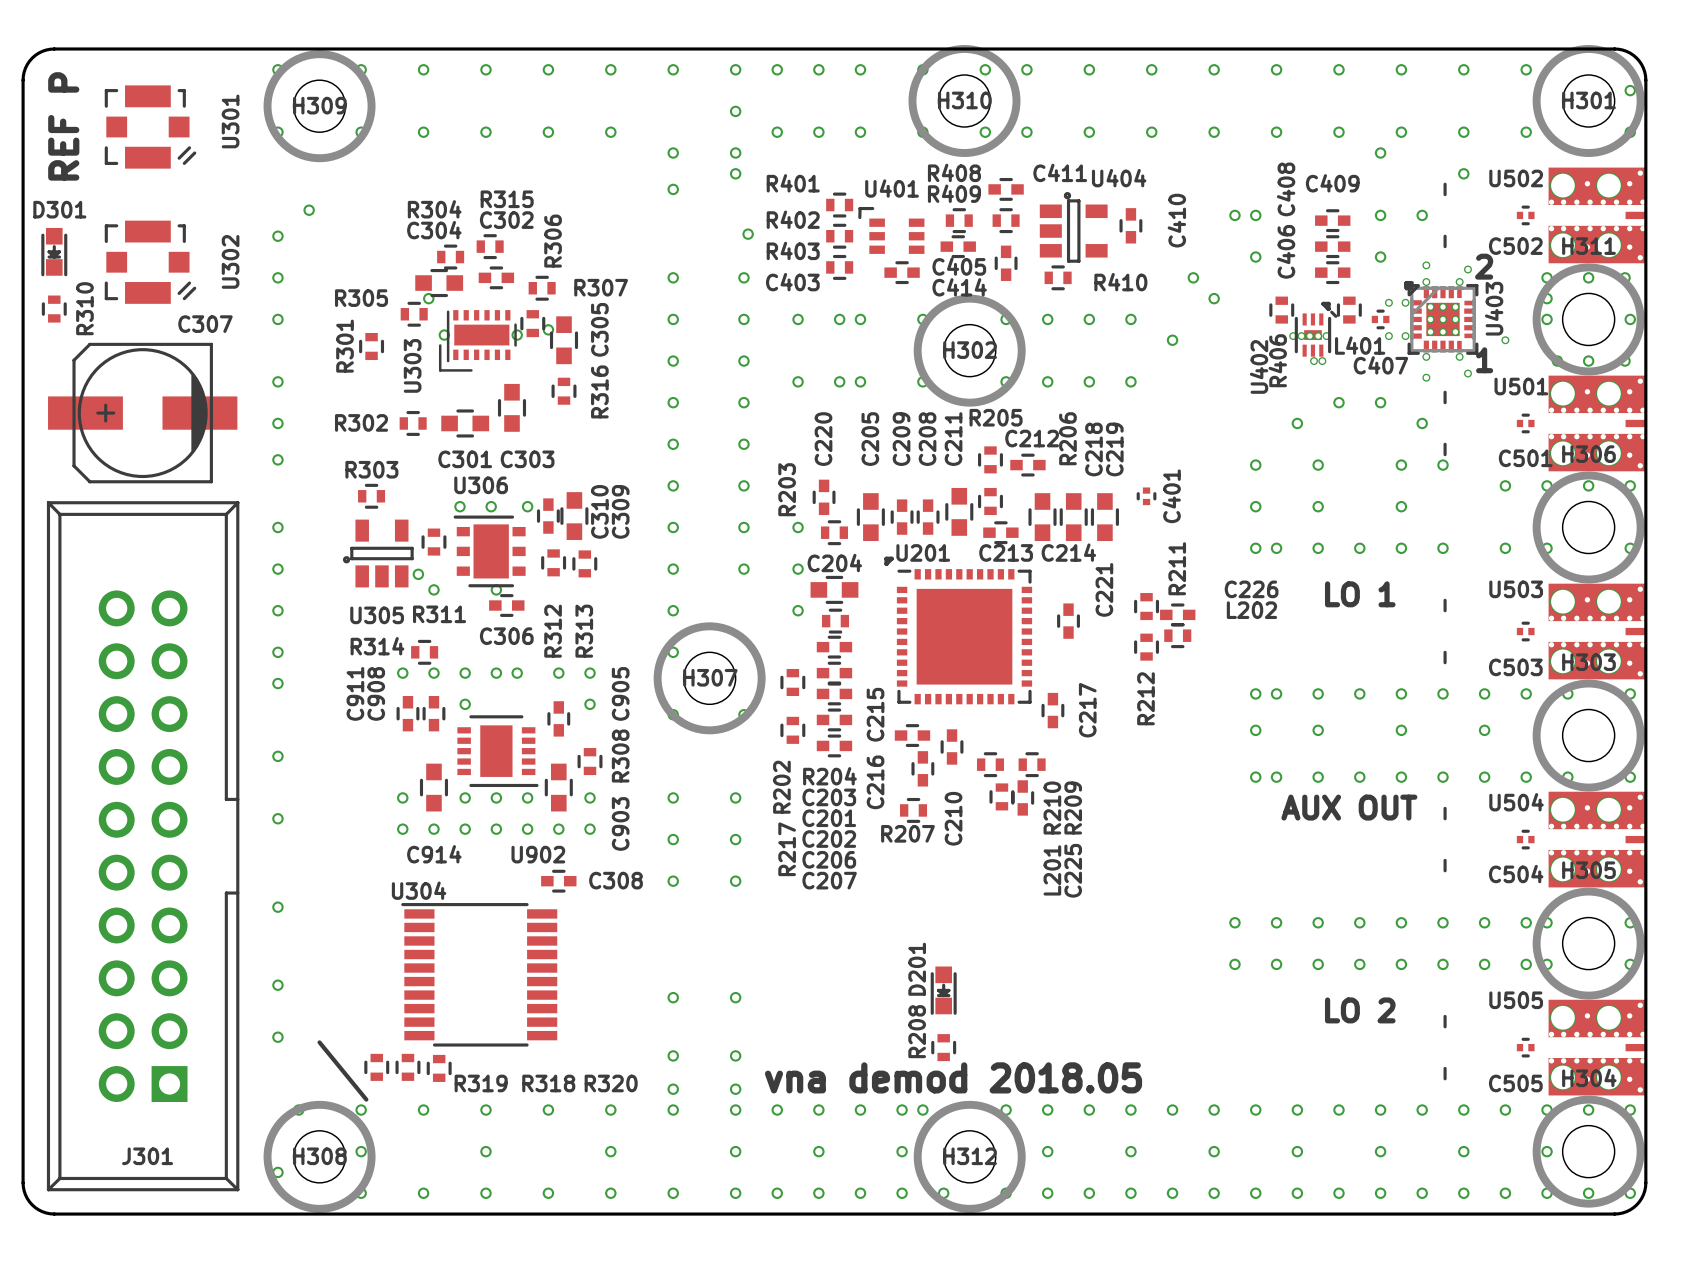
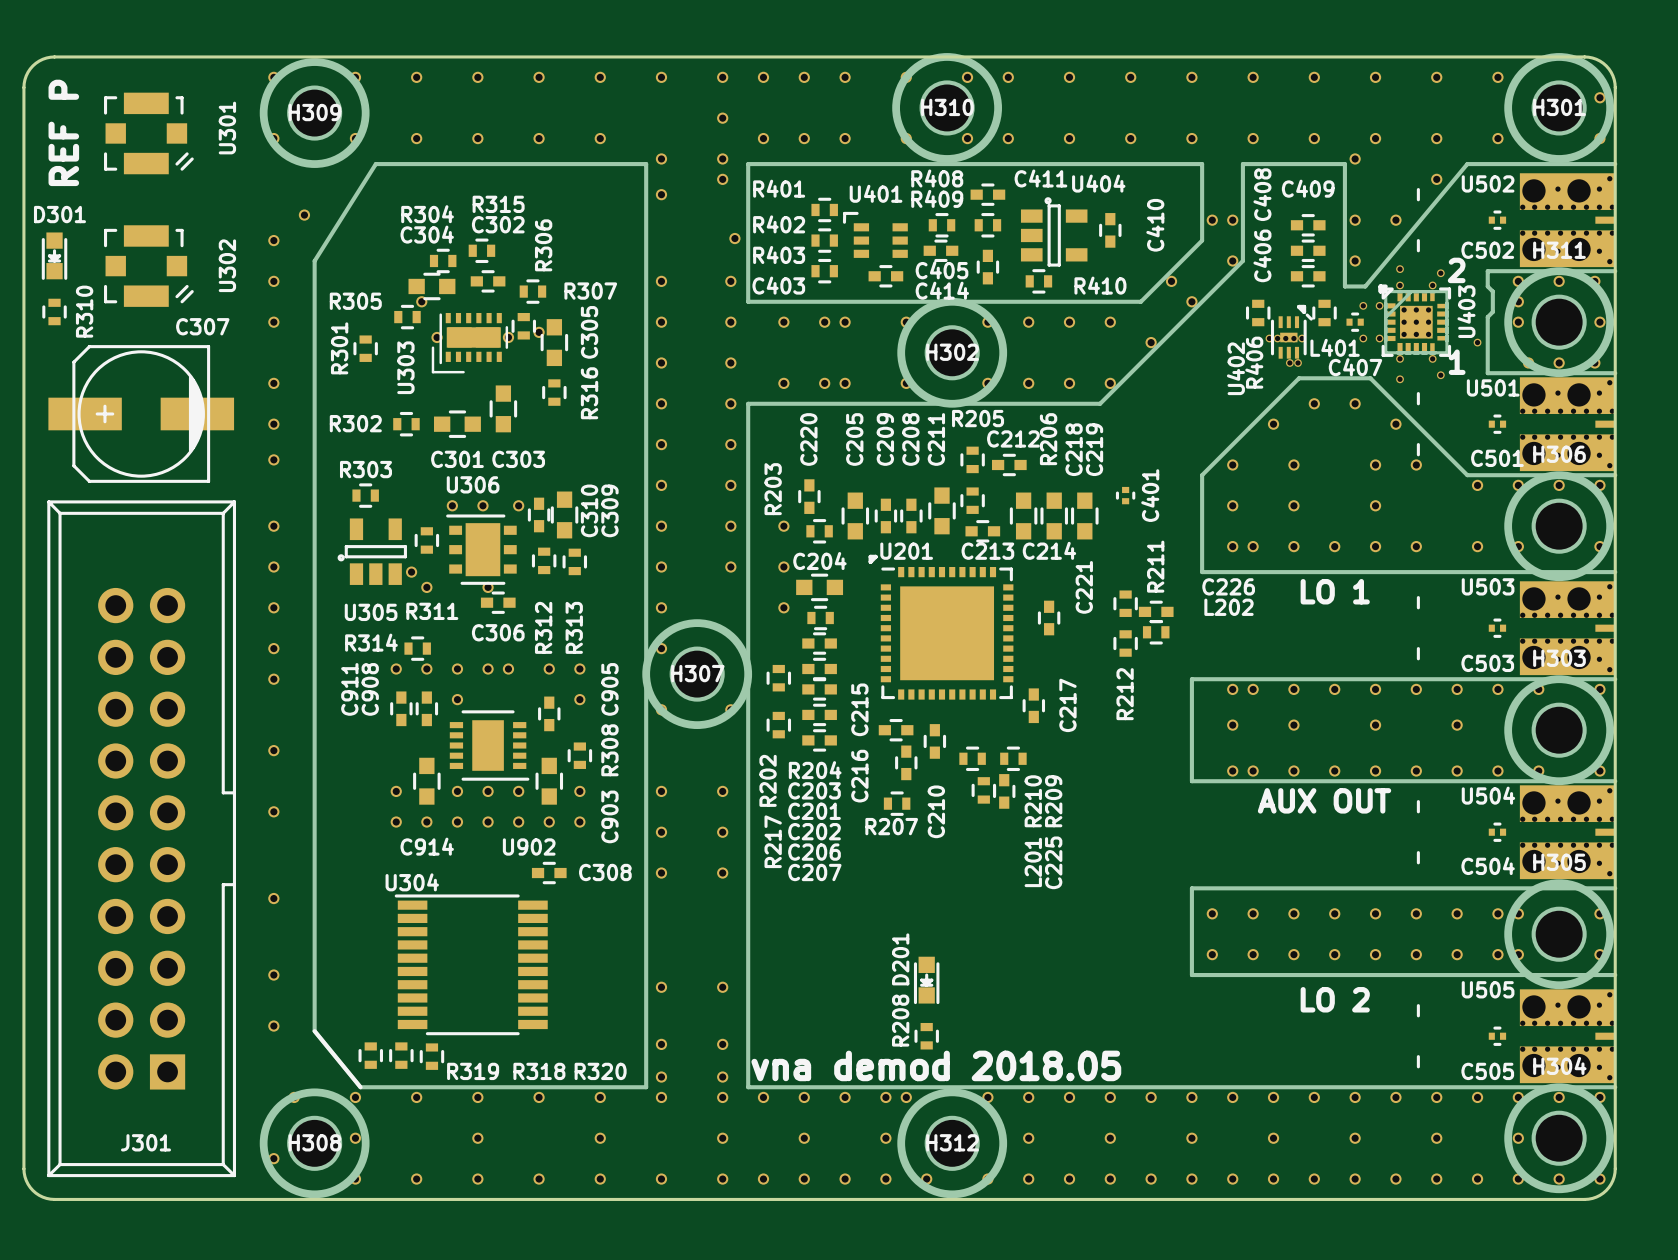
drawing: none -> [919, 80, 975, 136]
drawing: none -> [1531, 80, 1587, 136]
drawing: none -> [287, 85, 343, 141]
line: none -> (375, 164) (646, 164) (646, 1087) (360, 1087) (314, 1031) (314, 260) (375, 164)
line: none -> (748, 164) (1202, 164) (1202, 240) (1140, 301) (748, 301) (748, 164)
line: none -> (1615, 164) (1467, 164) (1365, 286) (1344, 286) (1344, 164) (1242, 164) (1242, 260) (1100, 403) (748, 403) (748, 1087) (1615, 1087)
line: none -> (1615, 271) (1487, 271) (1487, 286) (1492, 291) (1492, 311) (1487, 317) (1487, 373) (1615, 373)
drawing: none -> [1531, 294, 1587, 350]
drawing: none -> [924, 325, 980, 381]
line: none -> (1615, 475) (1467, 475) (1370, 378) (1299, 378) (1202, 475) (1202, 572) (1615, 572)
drawing: none -> [1531, 498, 1587, 554]
drawing: none -> [669, 646, 725, 702]
line: none -> (1615, 679) (1191, 679) (1191, 781) (1615, 781)
drawing: none -> [1531, 702, 1587, 758]
line: none -> (1615, 888) (1191, 888) (1191, 975) (1615, 975)
drawing: none -> [1531, 906, 1587, 962]
drawing: none -> [1531, 1110, 1587, 1166]
drawing: none -> [287, 1115, 343, 1171]
drawing: none -> [924, 1115, 980, 1171]

